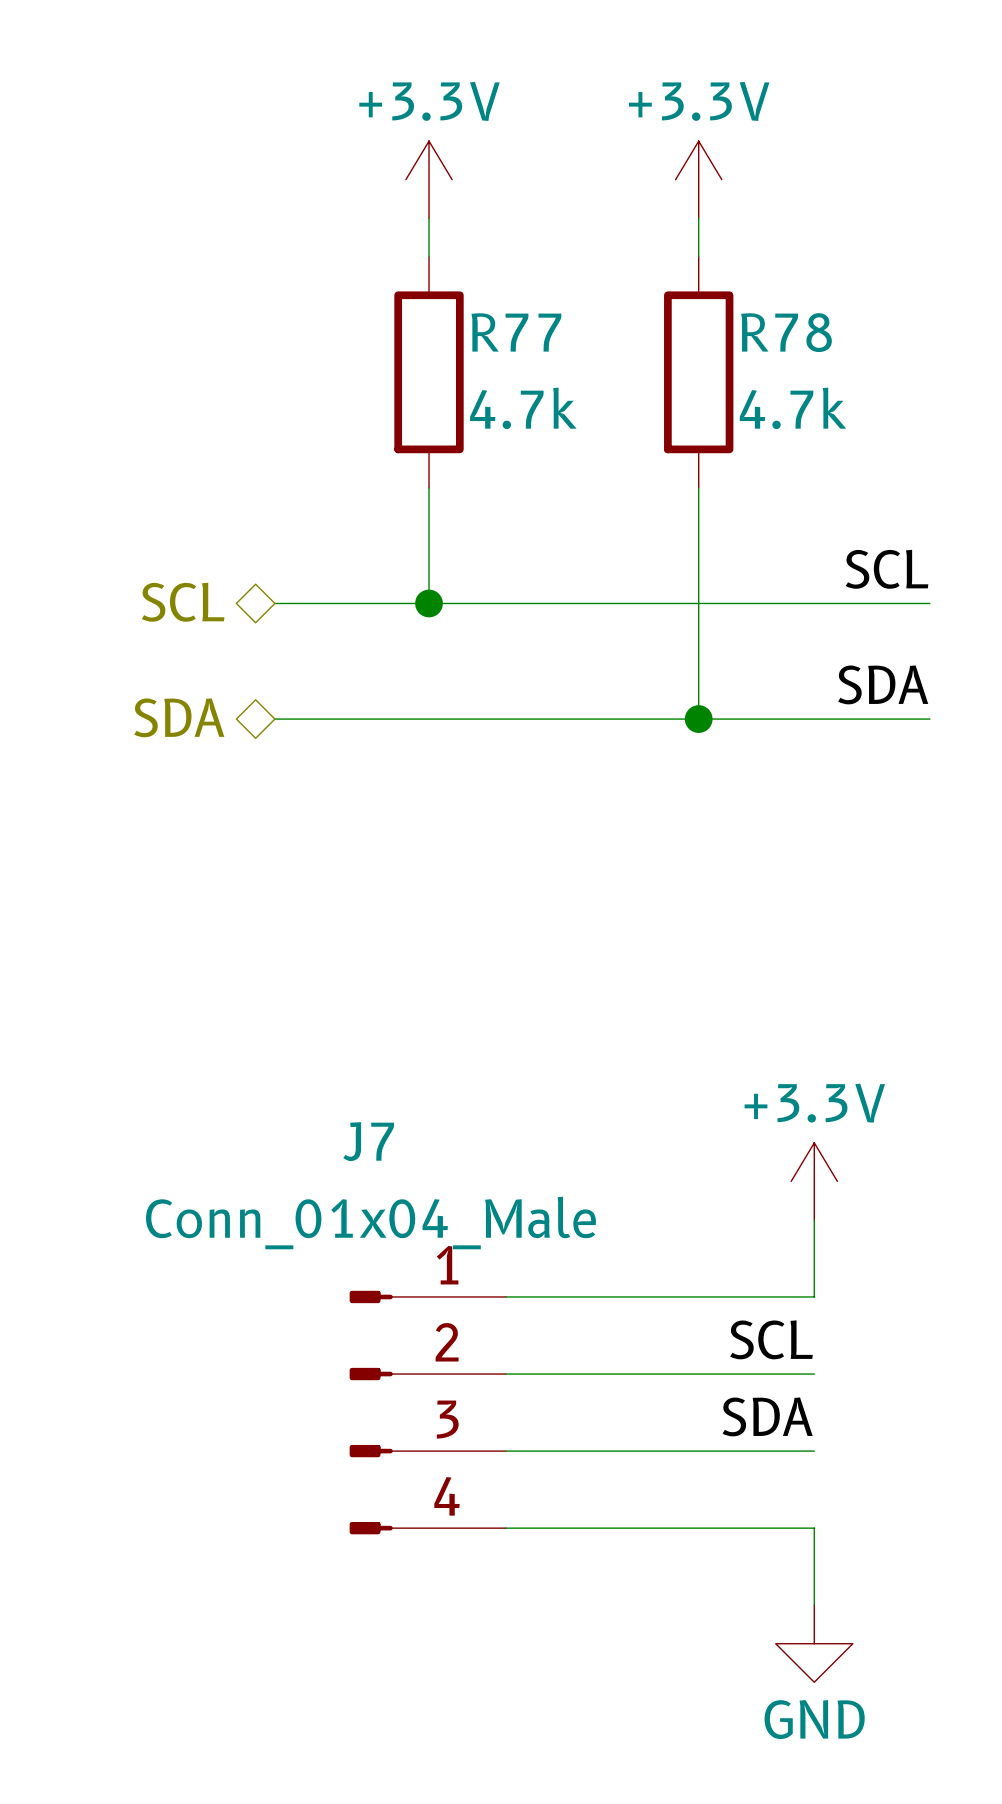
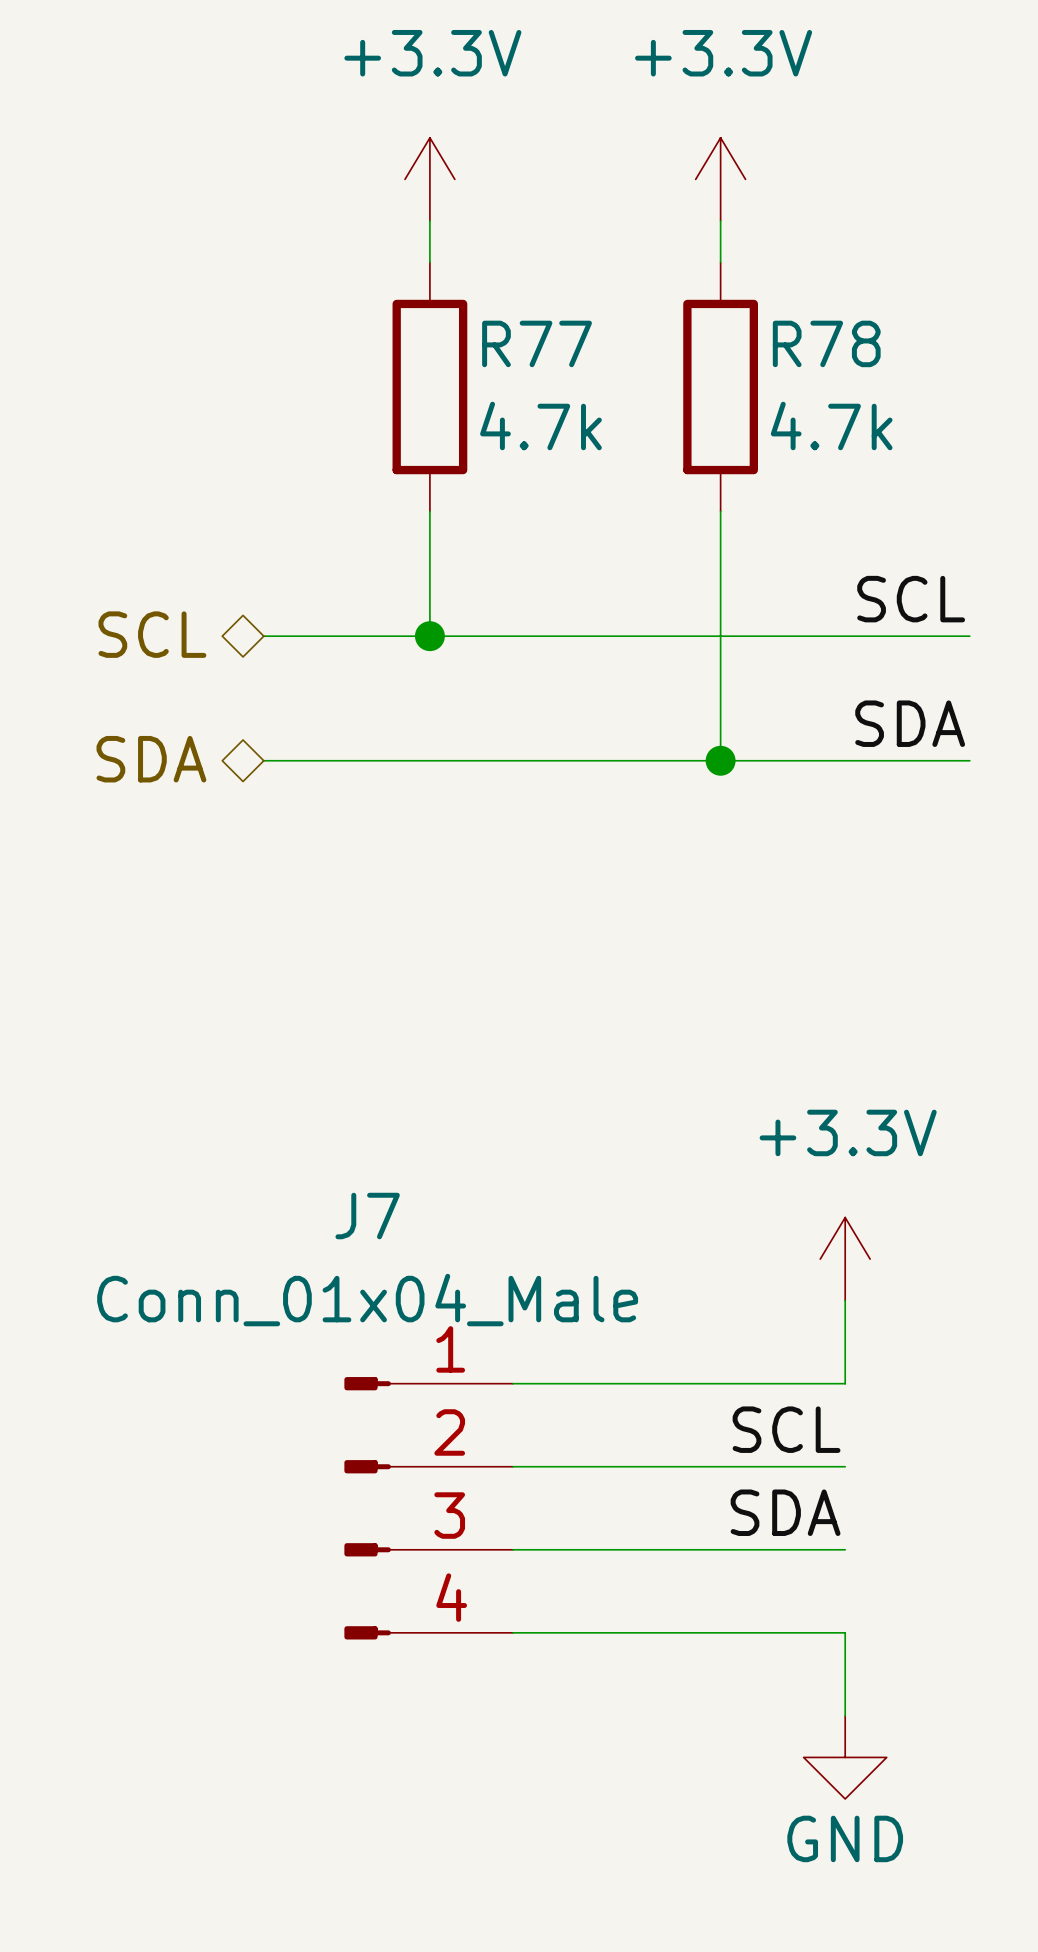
power symbol text position: +3.3V (429, 101) -> +3.3V (432, 53)
power symbol text position: +3.3V (699, 101) -> +3.3V (723, 53)
power symbol text position: +3.3V (814, 1103) -> +3.3V (848, 1132)

